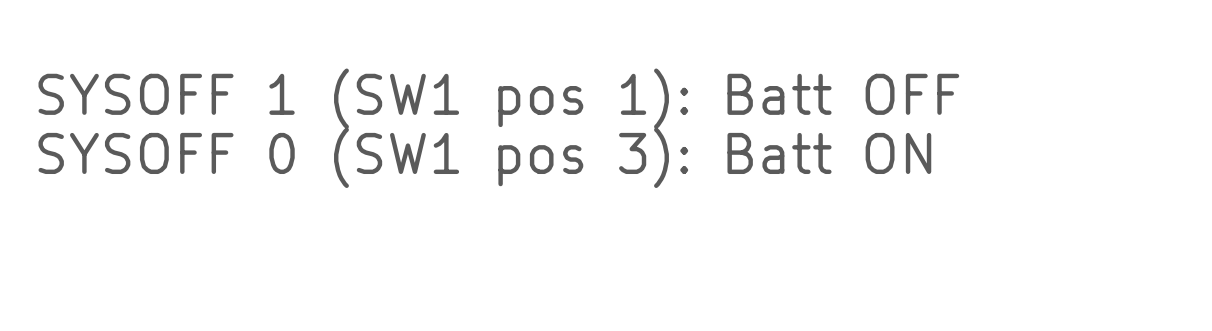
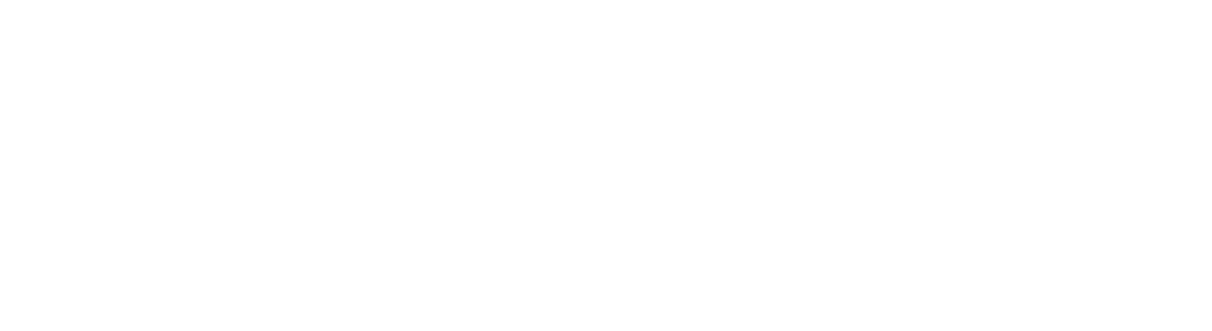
text: SYSOFF 1 (SW1 pos 1): Batt OFF (498, 98) -> none
text: SYSOFF 0 (SW1 pos 3): Batt ON (484, 157) -> none

